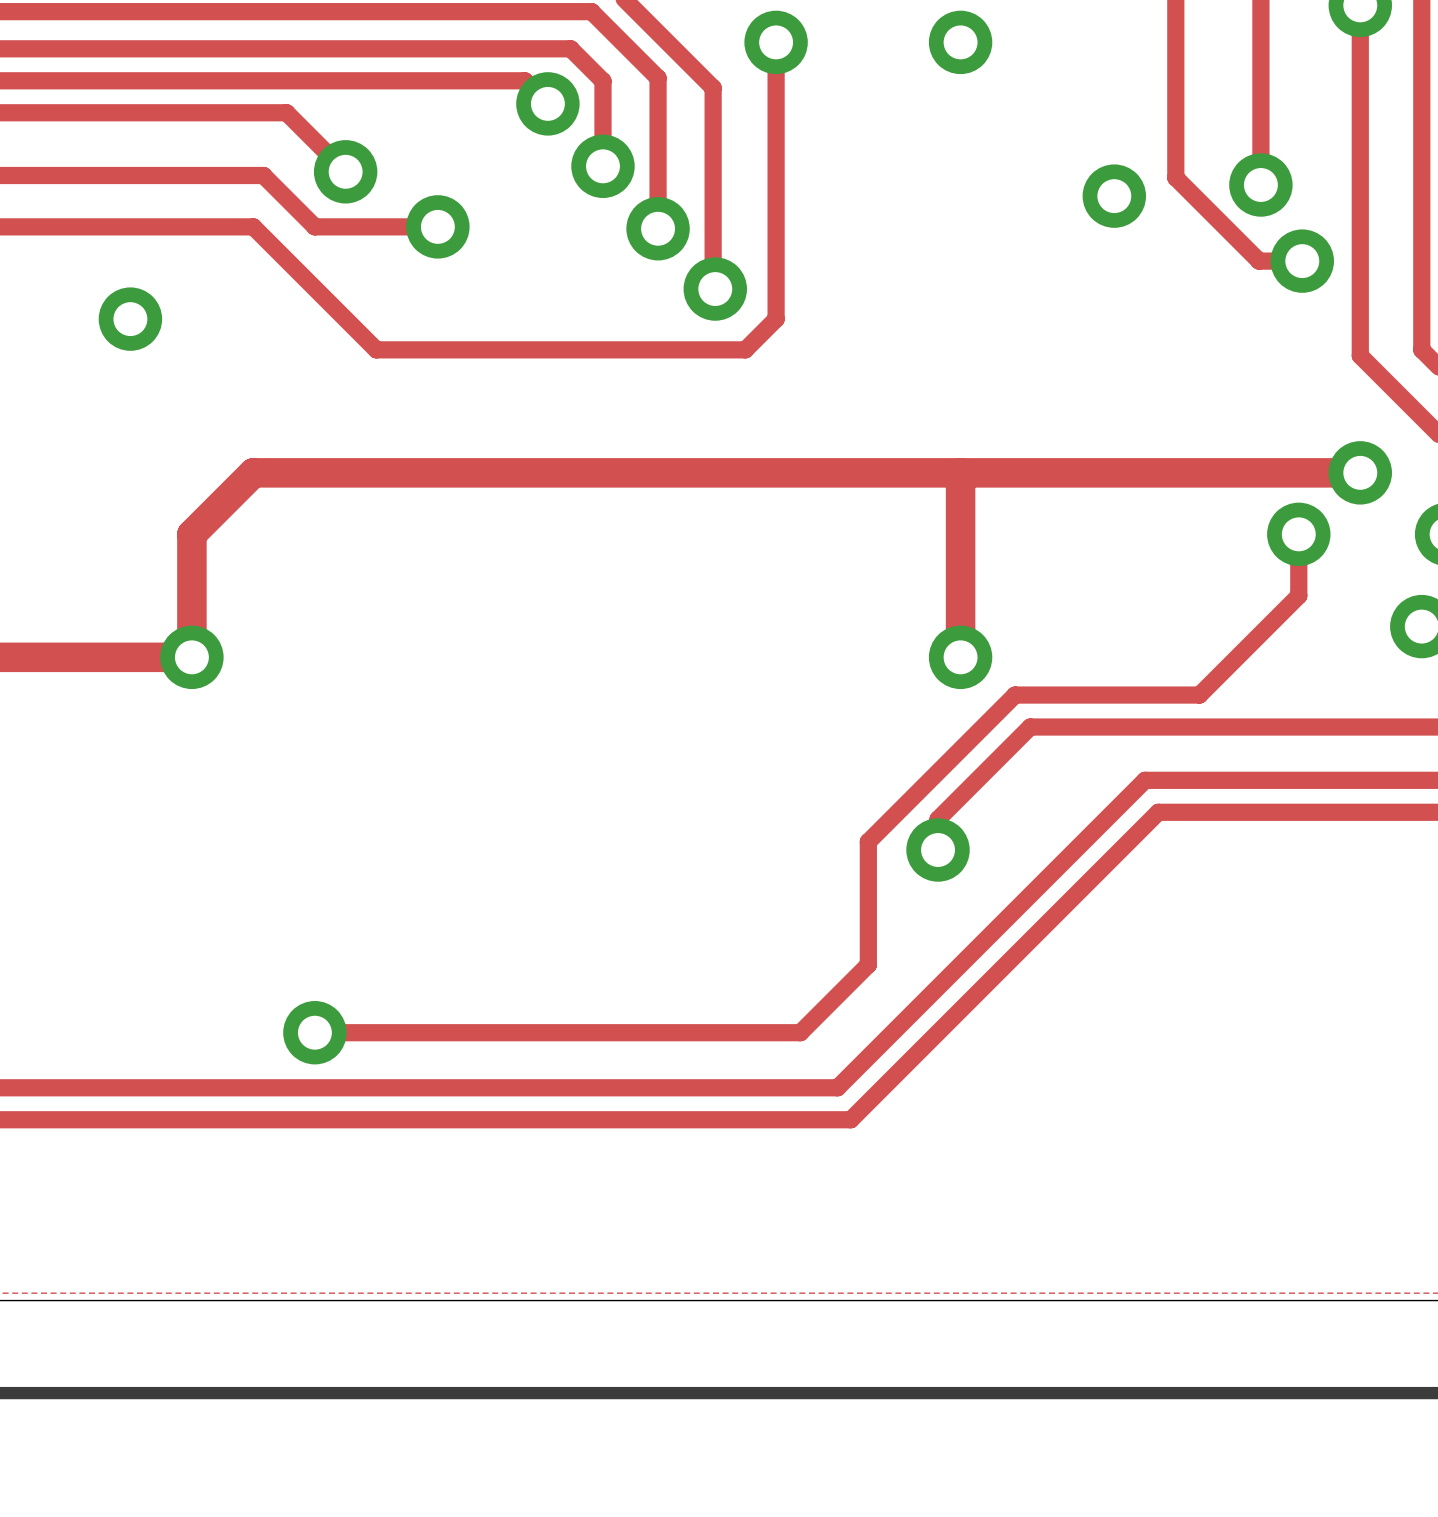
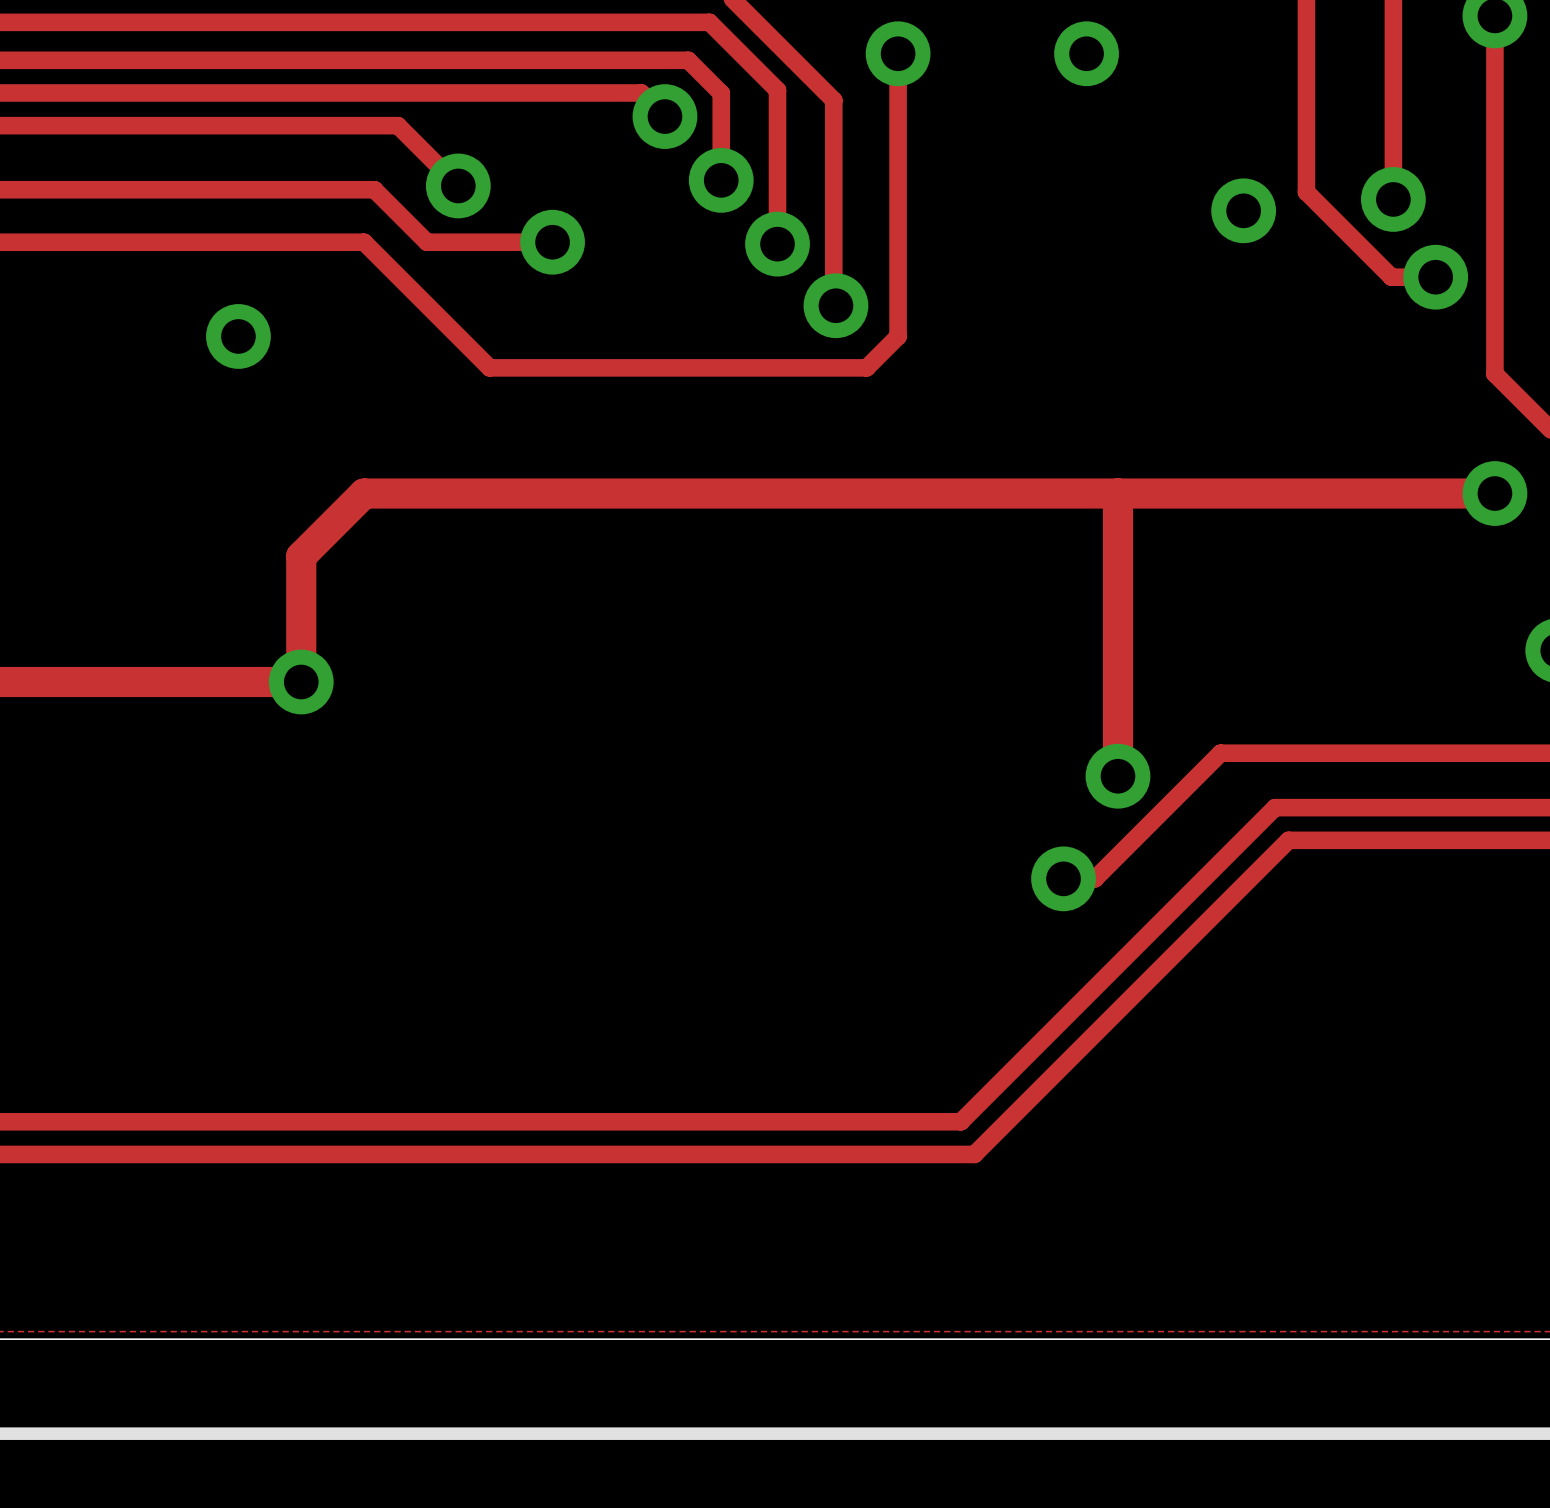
track: (960, 472) (960, 657) -> none
track: none -> (1117, 493) (1117, 776)
track: (1298, 534) (1298, 595) (1199, 695) (1015, 695) (868, 841) (868, 964) (800, 1032) (314, 1032) -> none
via: (1298, 534) -> none
via position: (960, 657) -> (1117, 776)
track: (1091, 727) (1030, 727) (938, 819) (938, 850) -> (1220, 753) (1094, 878) (1063, 878)
via: (314, 1032) -> none

